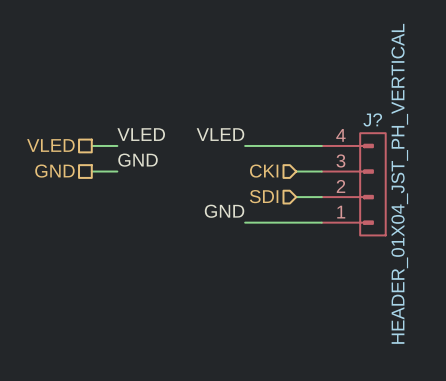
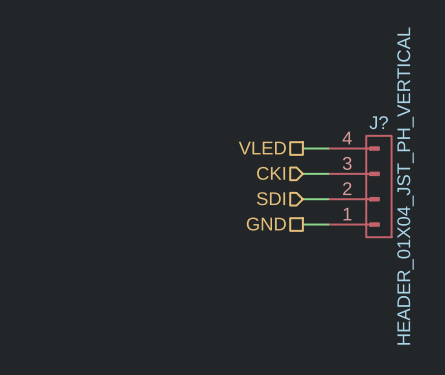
label: VLED (141, 134) -> none
label: VLED (220, 134) -> none
hierarchical label position: VLED (50, 145) -> VLED (262, 148)
wire: (91, 145) (117, 145) -> none
wire: (245, 145) (296, 145) -> none
label: GND (138, 160) -> none
hierarchical label position: GND (54, 171) -> GND (266, 224)
wire: (91, 171) (117, 171) -> none
label: GND (224, 211) -> none
wire: (245, 222) (296, 222) -> none

